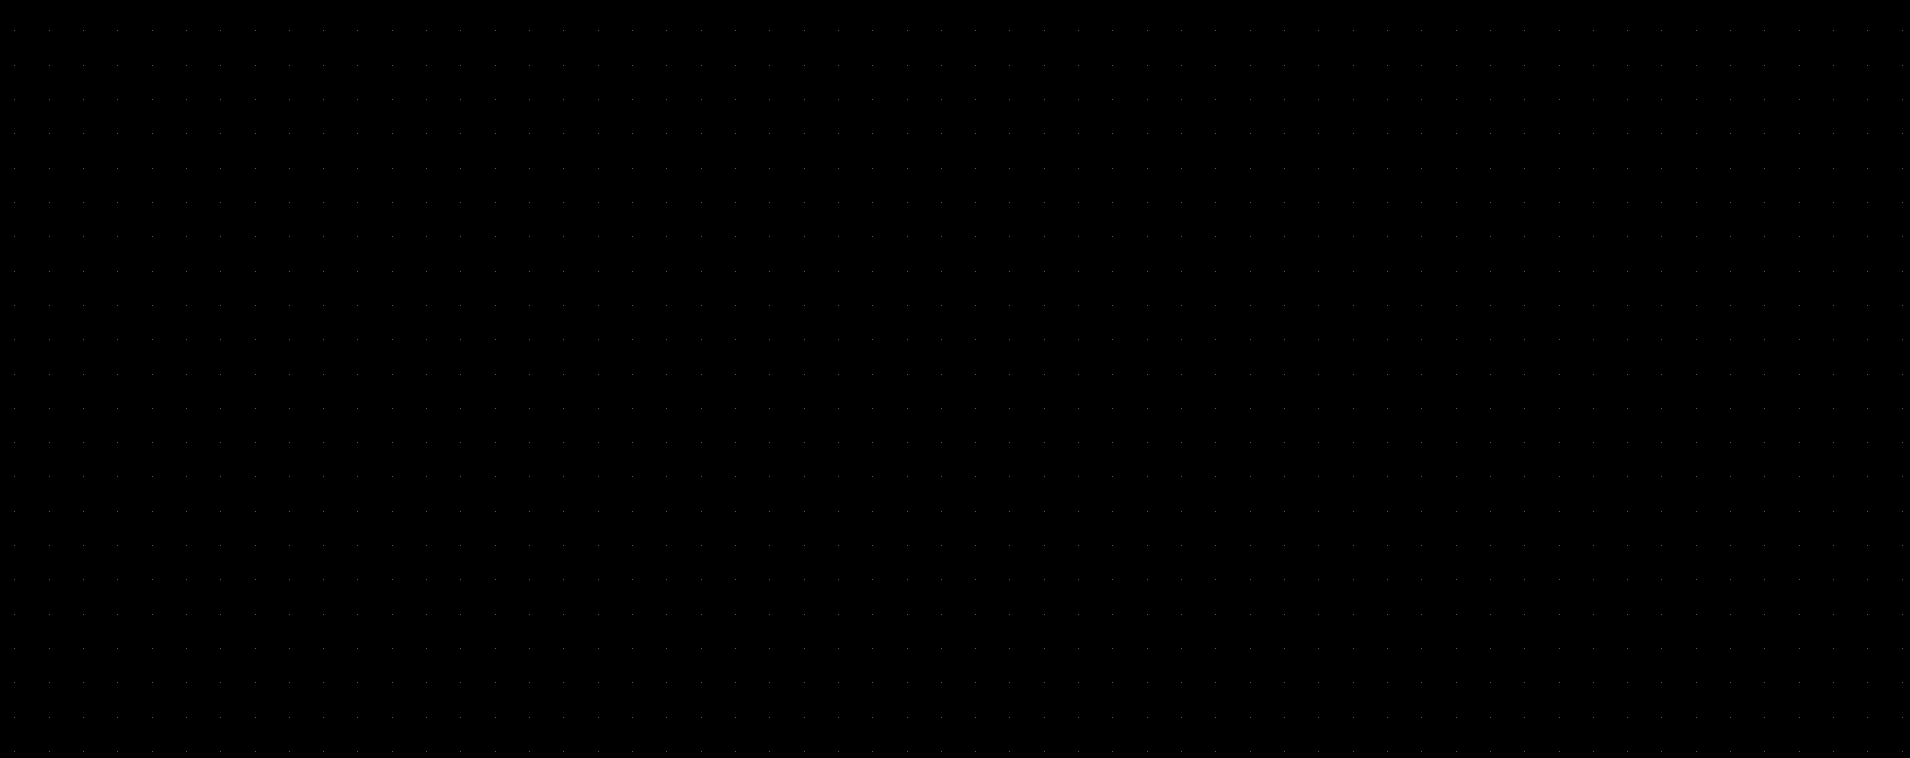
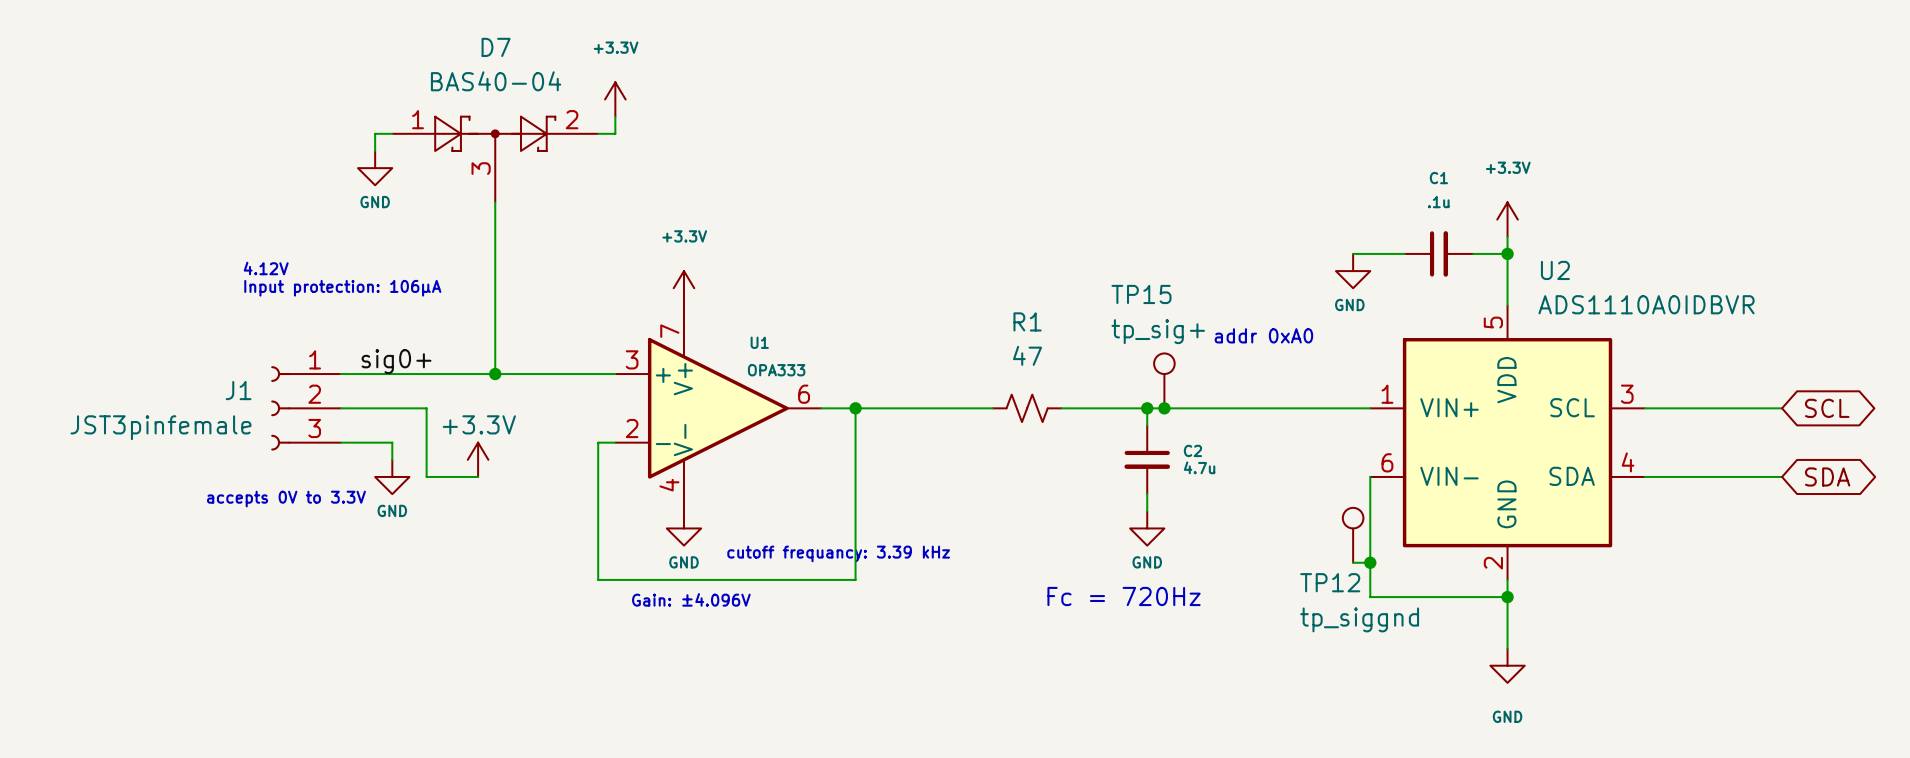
power symbol: none -> +3.3V (615, 99)
wire: none -> (615, 116) (615, 133) (598, 133)
wire: none -> (392, 133) (375, 133) (375, 150)
D7: none -> BAS40-04 (495, 159)
power symbol: none -> GND (375, 168)
wire: none -> (495, 202) (495, 374)
power symbol: none -> +3.3V (1507, 219)
wire: none -> (1507, 236) (1507, 305)
wire: none -> (1353, 253) (1404, 253)
C1: none -> .1u (1438, 253)
wire: none -> (1473, 253) (1507, 253)
junction: none -> (1507, 253)
text: none -> 4.12V (266, 268)
power symbol: none -> GND (1353, 271)
text: none -> Input protection: 106µA (342, 288)
power symbol: none -> +3.3V (683, 288)
text: none -> addr 0xA0 (1263, 335)
label: none -> sig0+ (396, 361)
wire: none -> (340, 374) (615, 374)
junction: none -> (495, 374)
TP15: none -> tp_sig+ (1164, 380)
J1: none -> JST3pinfemale (306, 408)
wire: none -> (340, 408) (426, 408) (426, 476) (478, 476)
U1: none -> OPA333 (718, 408)
wire: none -> (821, 408) (992, 408)
wire: none -> (855, 408) (855, 579) (598, 579) (598, 442) (615, 442)
junction: none -> (855, 408)
R1: none -> 47 (1027, 408)
wire: none -> (1061, 408) (1370, 408)
wire: none -> (1147, 408) (1147, 425)
junction: none -> (1147, 408)
junction: none -> (1164, 408)
wire: none -> (1644, 408) (1782, 408)
global label: none -> SCL (1827, 408)
wire: none -> (340, 442) (392, 442) (392, 459)
U2: none -> ADS1110A0IDBVR (1507, 442)
power symbol: none -> +3.3V (478, 459)
C2: none -> 4.7u (1147, 459)
power symbol: none -> GND (392, 476)
wire: none -> (1370, 476) (1370, 597) (1507, 597)
wire: none -> (1644, 476) (1782, 476)
global label: none -> SDA (1827, 476)
wire: none -> (1147, 494) (1147, 511)
text: none -> accepts 0V to 3.3V (286, 499)
power symbol: none -> GND (683, 528)
power symbol: none -> GND (1147, 528)
TP12: none -> tp_siggnd (1353, 535)
text: none -> cutoff frequancy: 3.39 kHz (838, 553)
wire: none -> (1353, 562) (1370, 562)
junction: none -> (1370, 562)
wire: none -> (1507, 579) (1507, 648)
text: none -> Fc = 720Hz (1124, 596)
junction: none -> (1507, 597)
text: none -> Gain: ±4.096V (691, 599)
power symbol: none -> GND (1507, 665)

